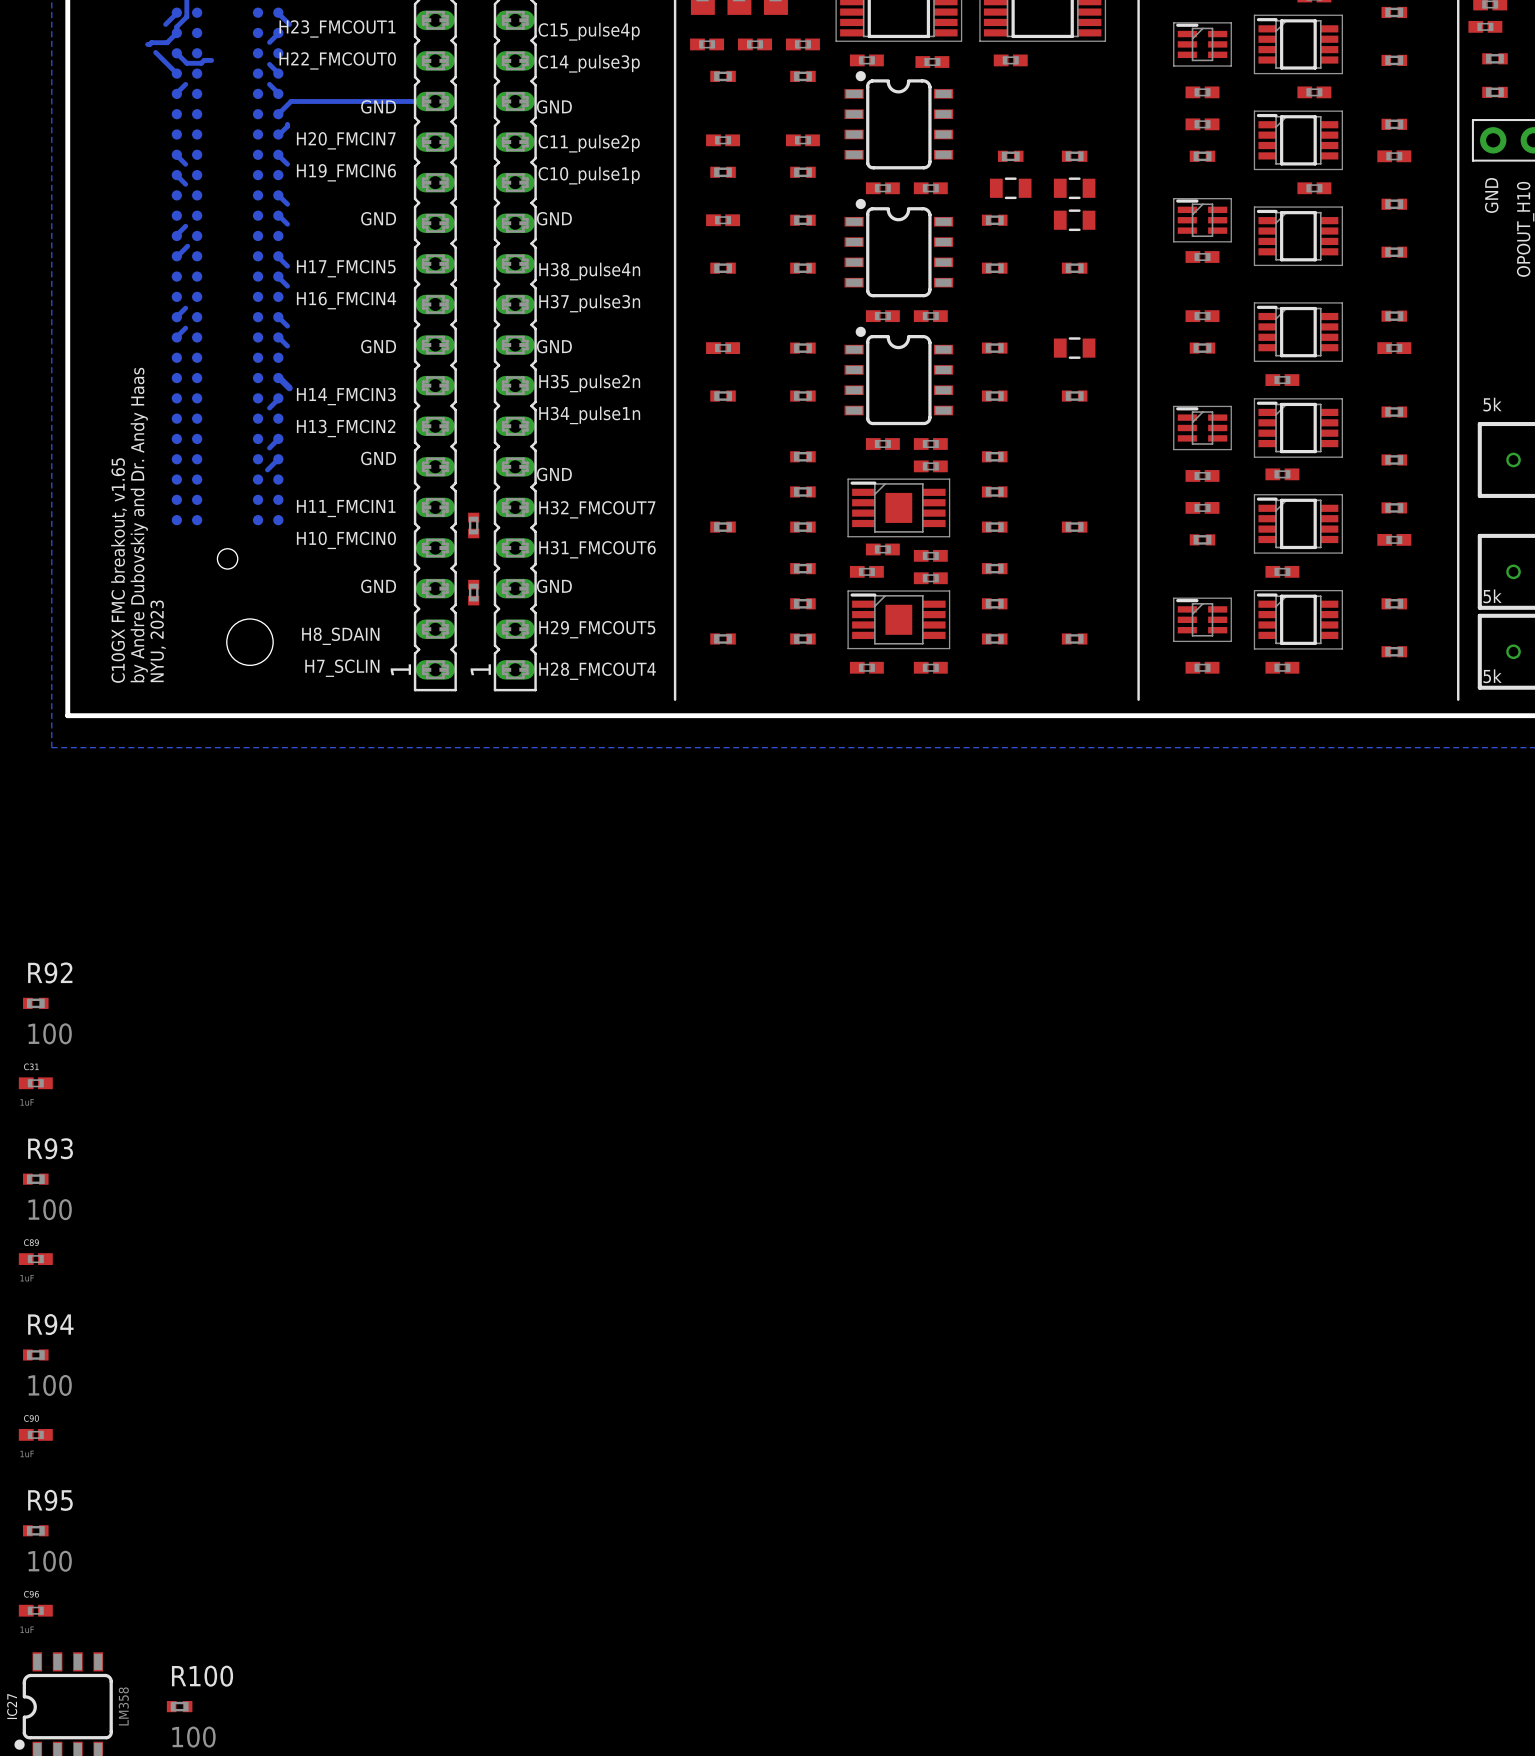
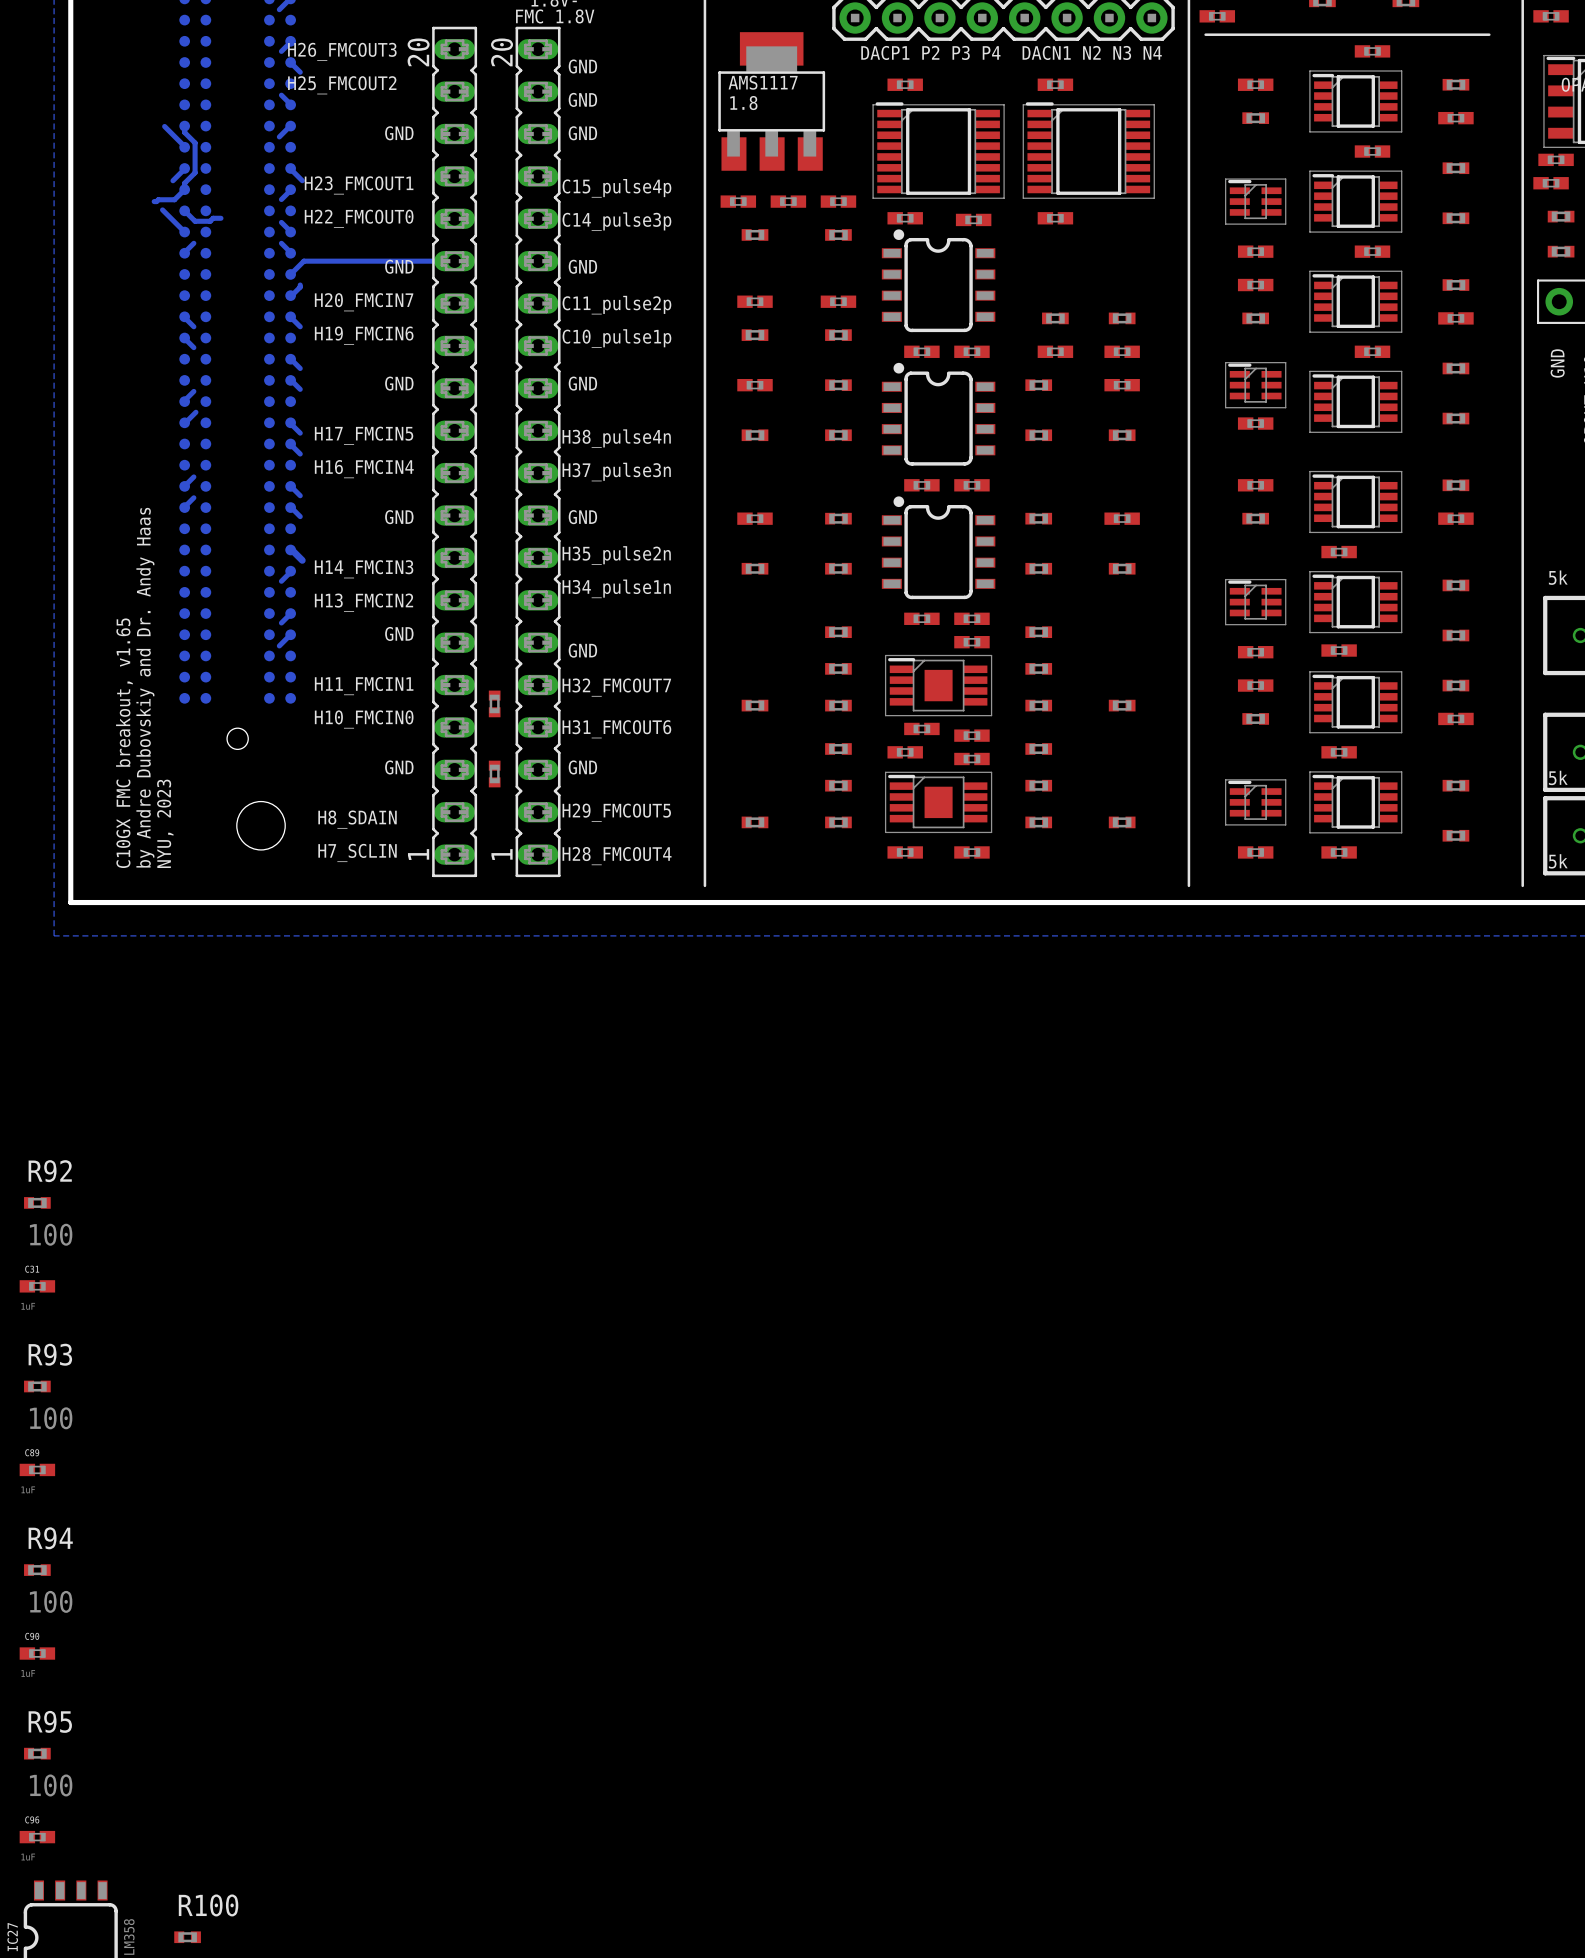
part footprint: [989, 177, 1032, 200] -> [1037, 345, 1074, 358]
part footprint: [1053, 177, 1096, 200] -> [1104, 345, 1140, 358]
part footprint: [1053, 209, 1096, 232] -> [1104, 378, 1140, 392]
part footprint: [1053, 337, 1096, 359] -> [1104, 512, 1140, 525]

